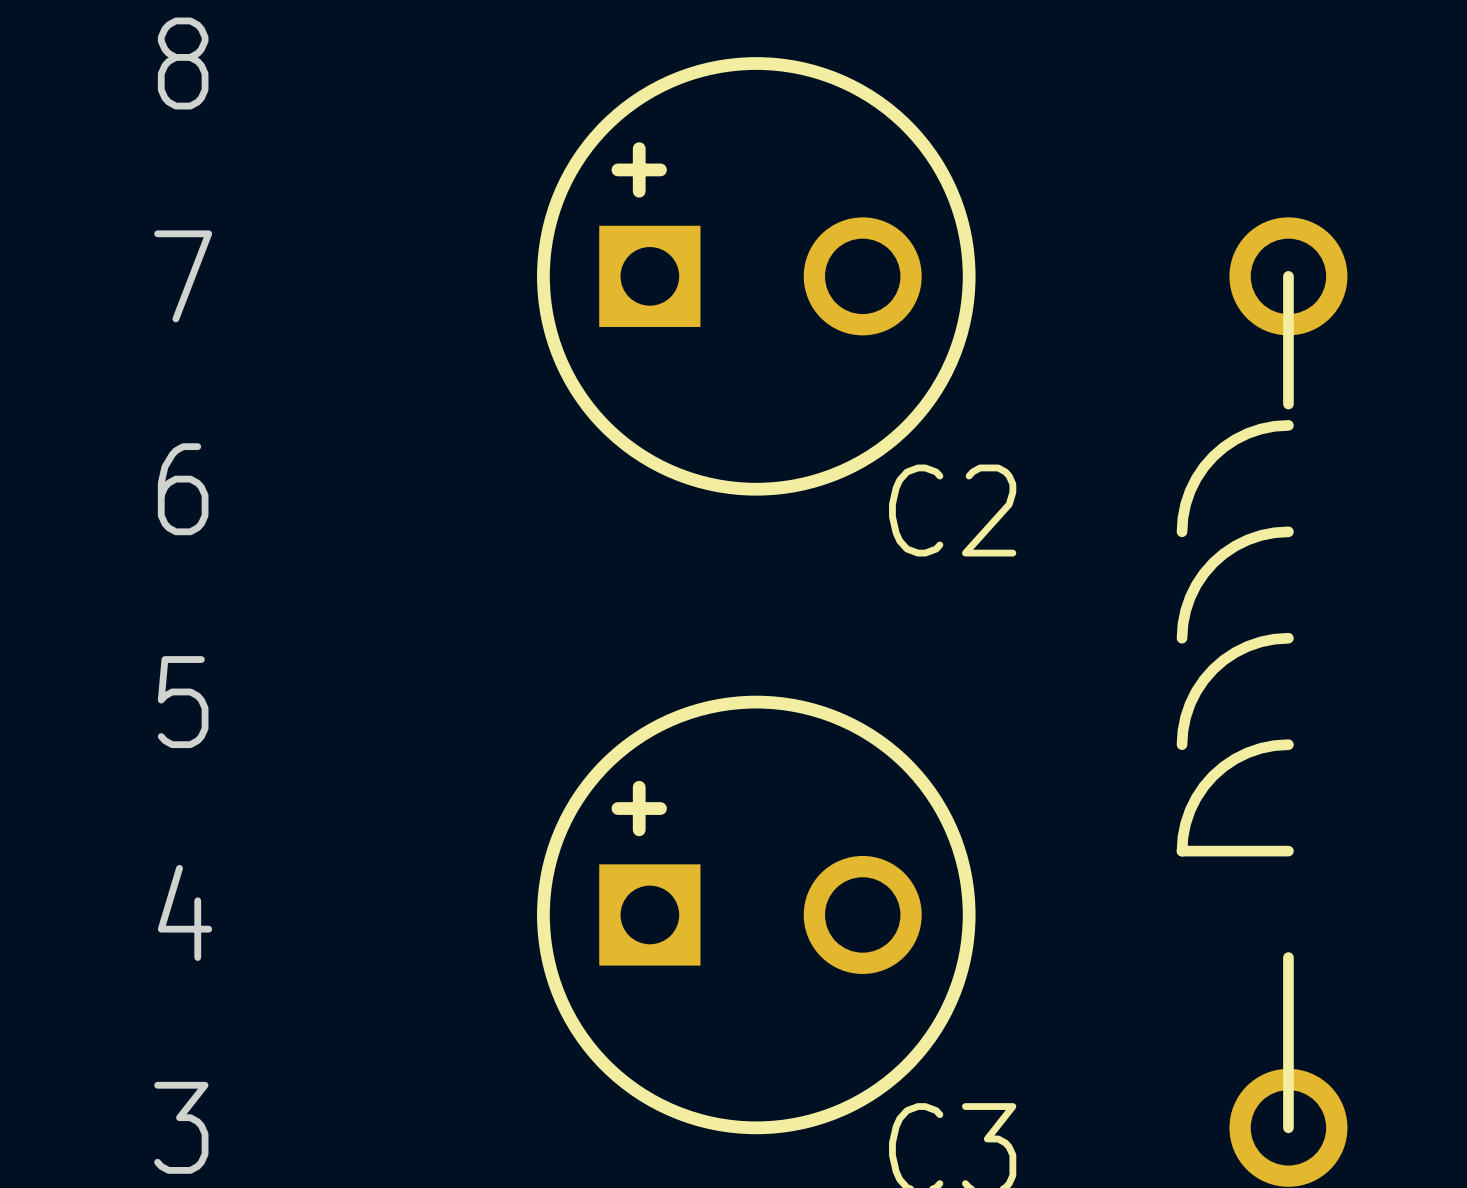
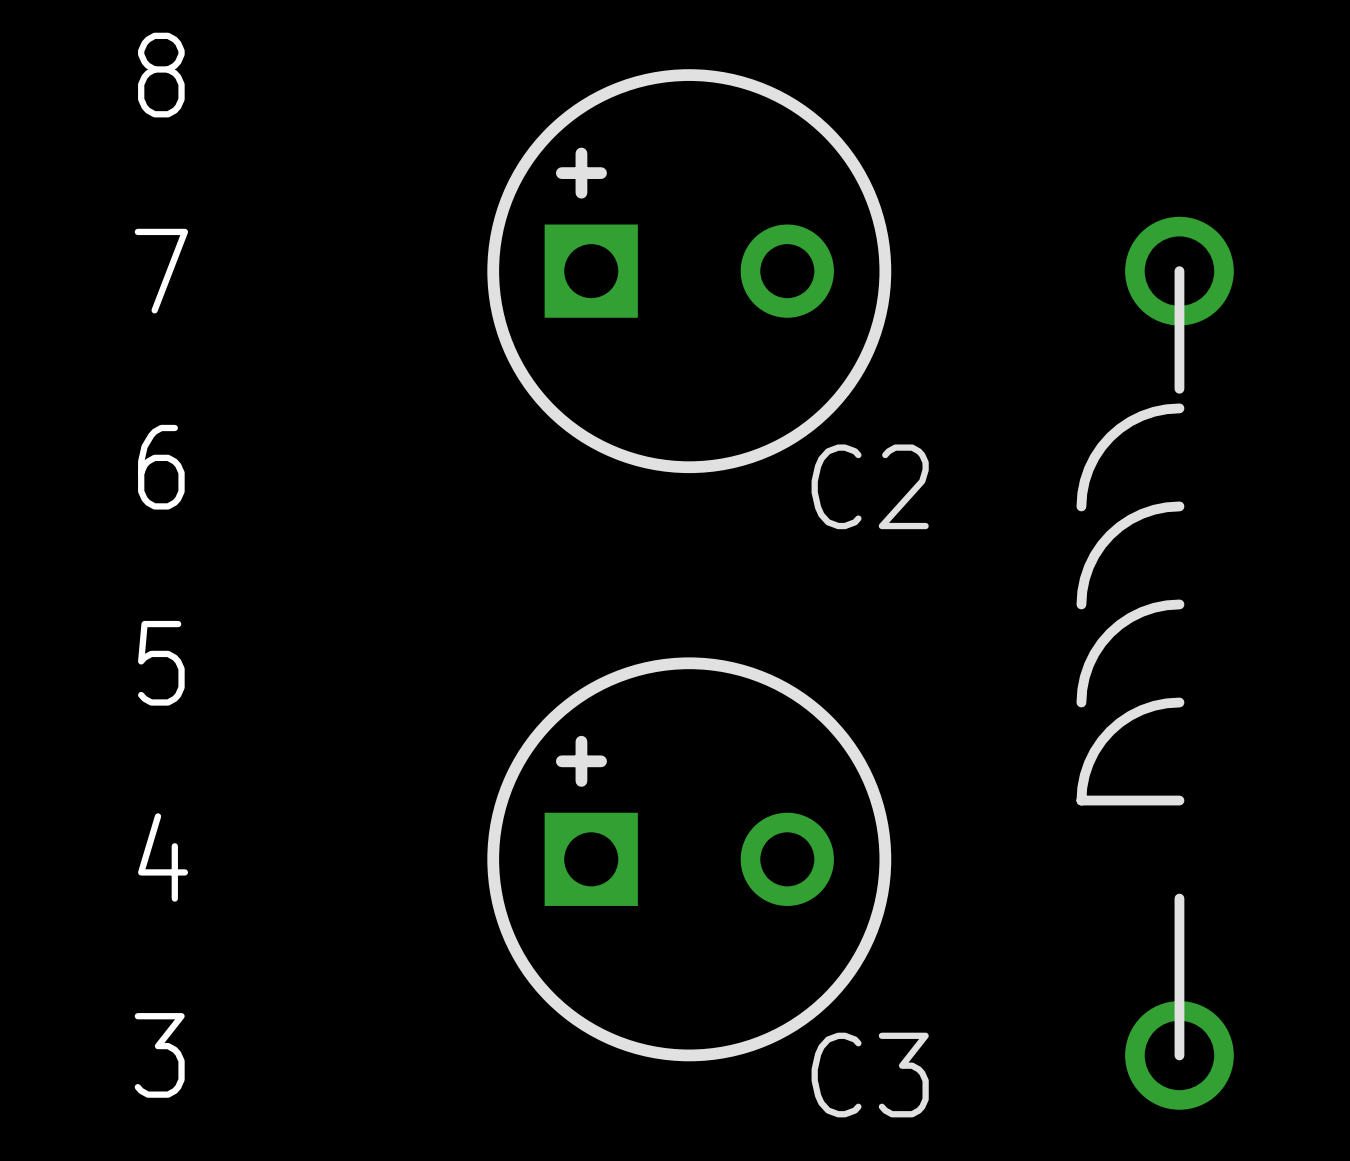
C2 footprint: [537, 57, 976, 496] -> [487, 69, 892, 474]
C3 footprint: [537, 695, 976, 1135] -> [487, 657, 892, 1062]

